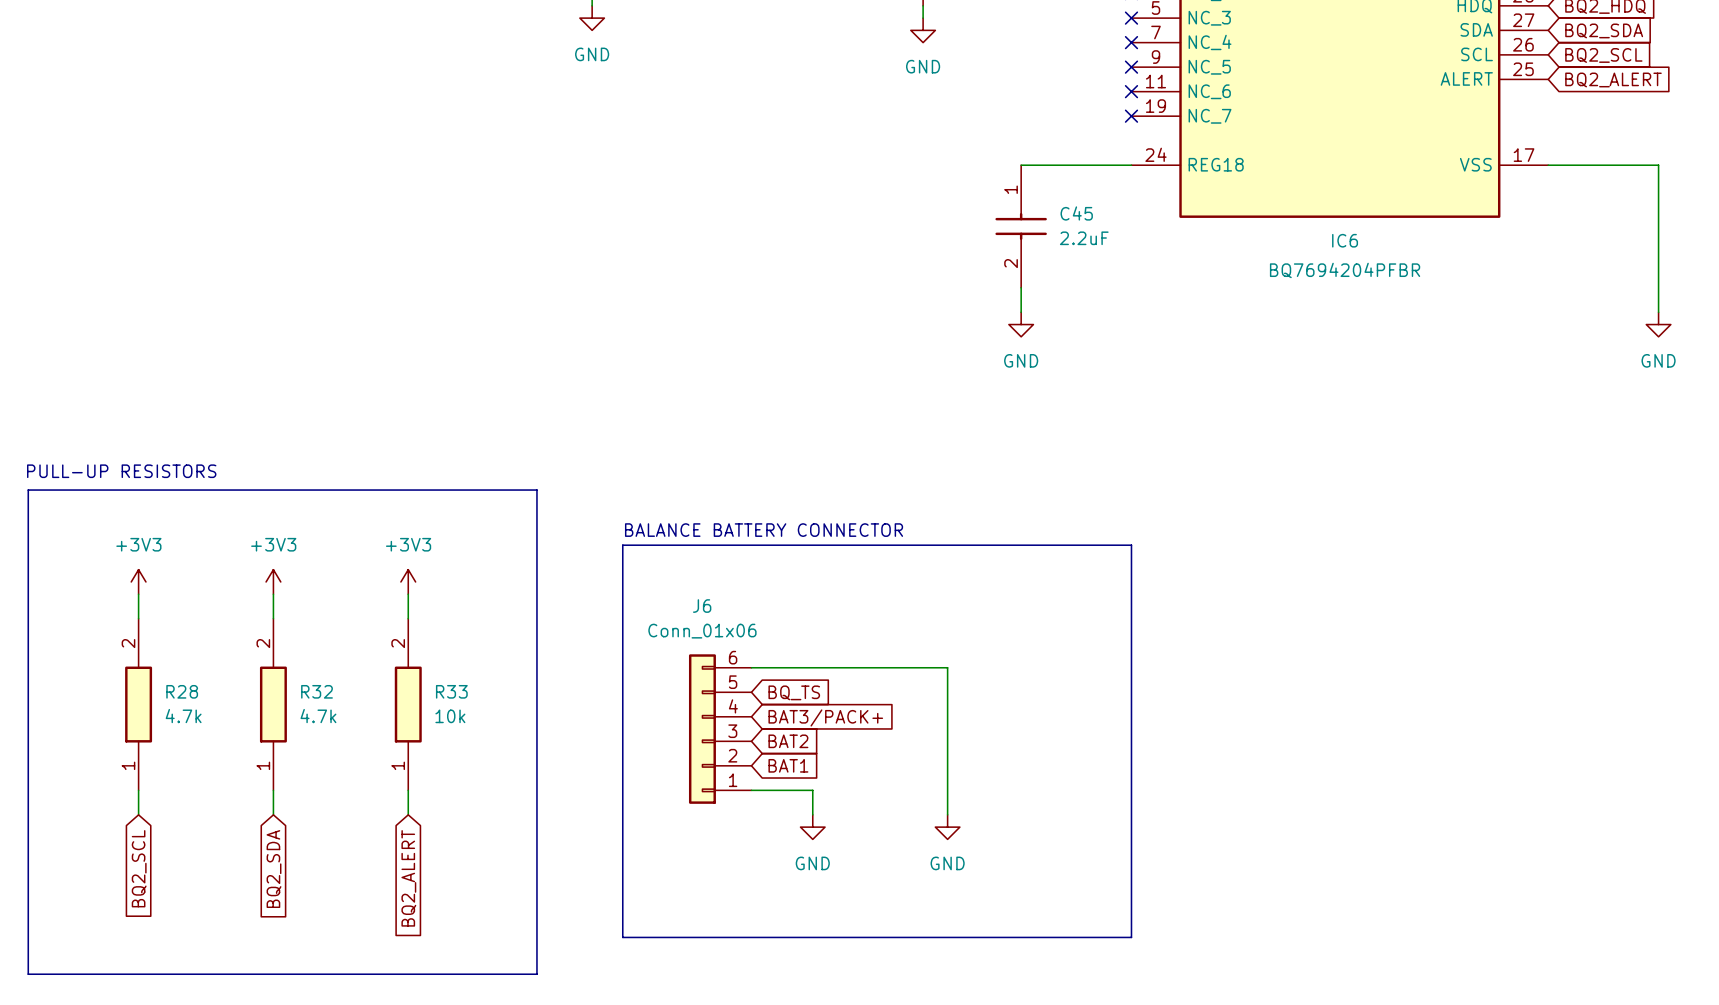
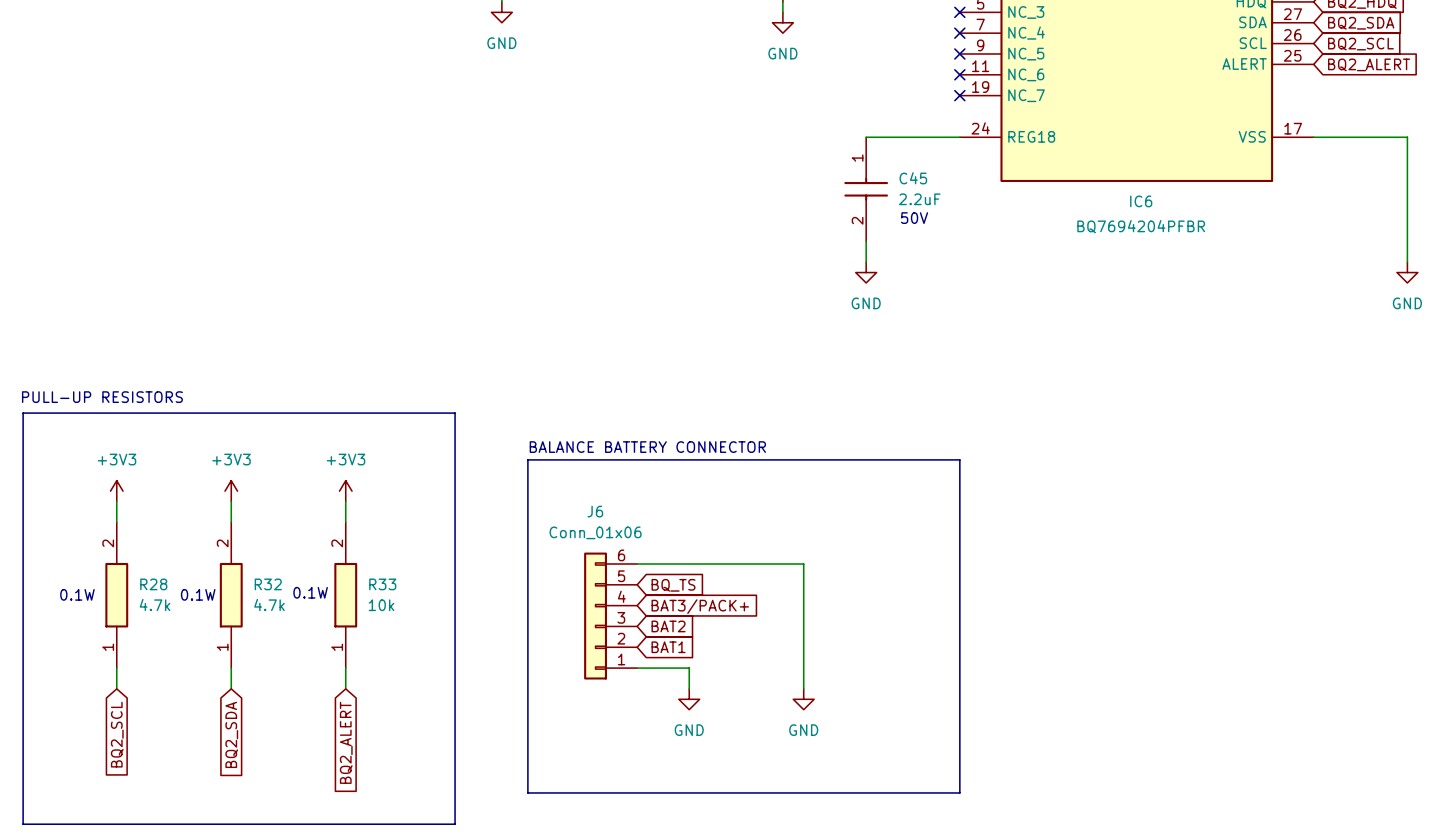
text: none -> 50V (914, 218)
text: none -> 0.1W (310, 592)
text: none -> 0.1W (77, 594)
text: none -> 0.1W (198, 594)

